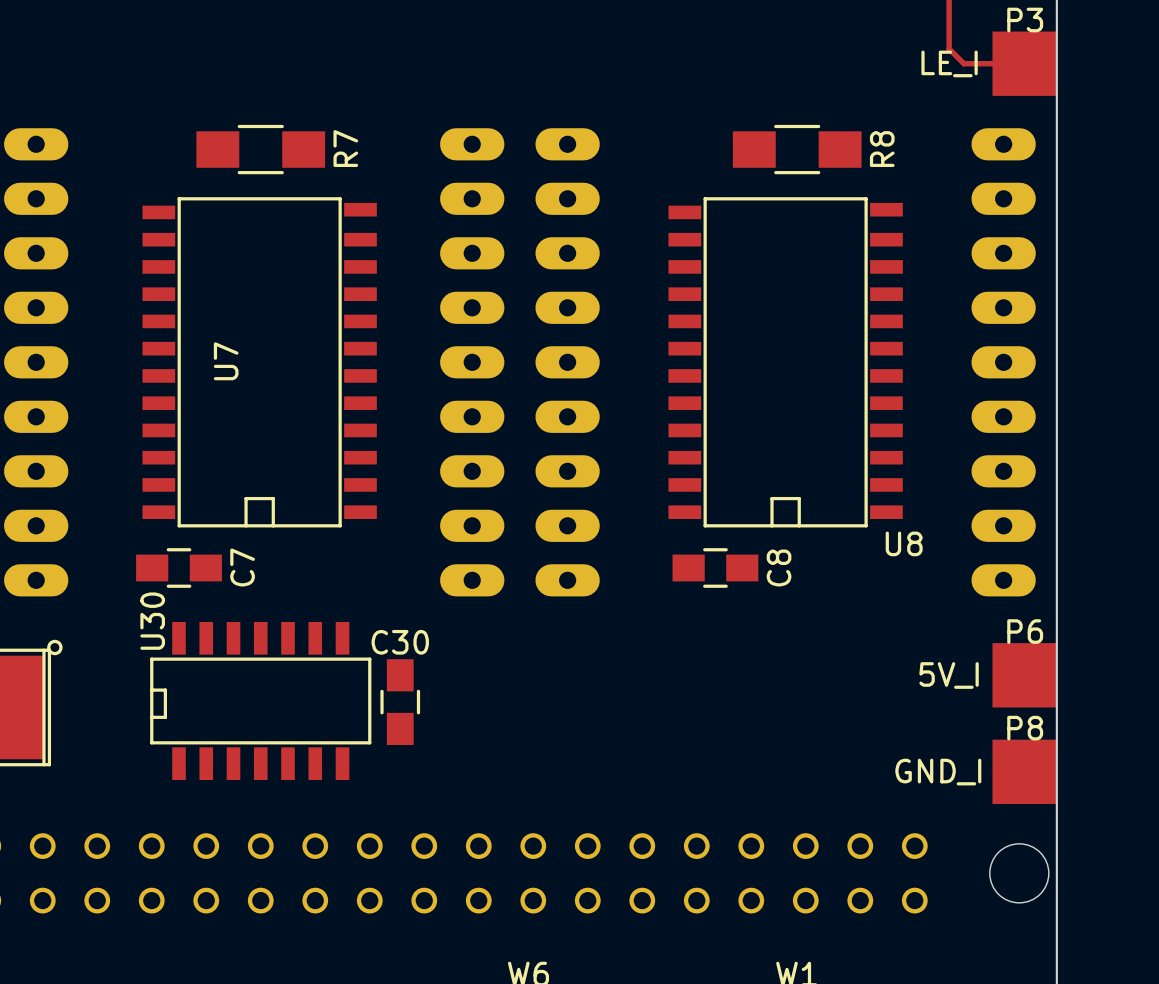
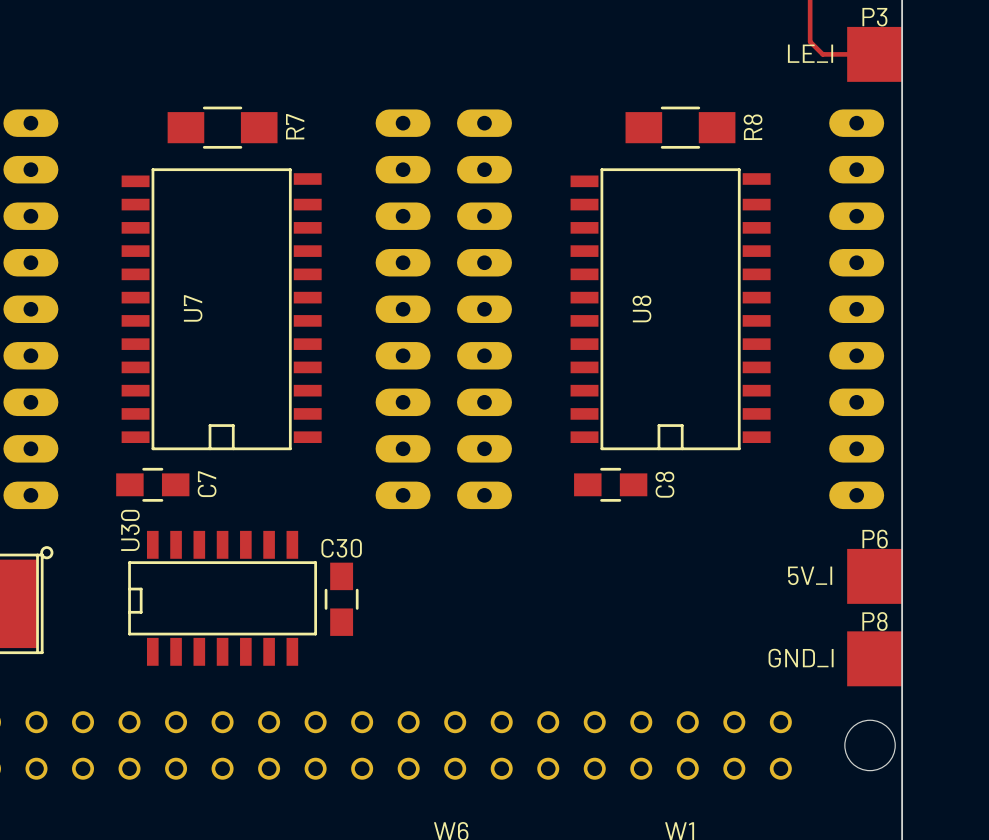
U8 name rotation: 0° (904, 543) -> 90° counterclockwise (641, 308)
U8 name position: U8 (904, 543) -> U8 (641, 308)

